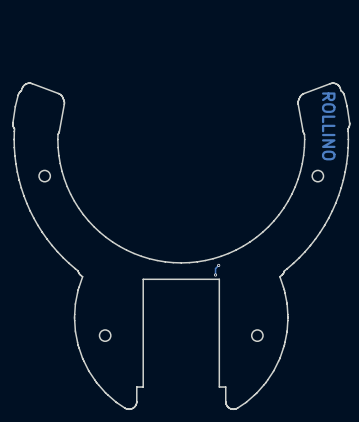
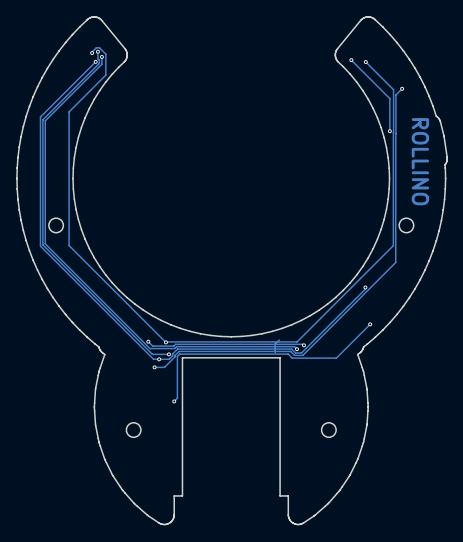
track: none -> (97, 51) (99, 63) (42, 119) (42, 244) (152, 354) (168, 354)
via: none -> (97, 51)
track: none -> (92, 53) (96, 47) (99, 47) (105, 54) (105, 75) (69, 111) (69, 245) (165, 342)
via: none -> (92, 53)
track: none -> (101, 56) (101, 64) (45, 120) (45, 243) (149, 348) (174, 348) (176, 346) (294, 346) (297, 349)
via: none -> (101, 56)
track: none -> (351, 60) (389, 98) (389, 131)
via: none -> (351, 60)
track: none -> (95, 61) (40, 117) (40, 246) (153, 359) (169, 359) (177, 349) (291, 349) (295, 353) (301, 353) (365, 287)
via: none -> (95, 61)
track: none -> (365, 62) (393, 89) (393, 245) (297, 341) (165, 342)
via: none -> (365, 62)
track: none -> (402, 88) (395, 94) (395, 262) (302, 355) (294, 355) (290, 351) (179, 351) (164, 367) (154, 367)
via: none -> (402, 88)
board edge: (340, 88) (336, 84) (331, 83) (300, 96) (298, 103) (304, 139) -> (435, 113) (420, 77) (397, 42) (373, 18) (368, 16) (361, 19) (337, 48) (335, 56) (362, 90) (377, 117) (386, 147) (389, 178)
via: none -> (389, 131)
board edge: (14, 131) (12, 122) (18, 94) (24, 85) (31, 83) (59, 93) (62, 97) (64, 103) (57, 139) -> (17, 167) (21, 136) (26, 116) (42, 77) (53, 59) (72, 34) (88, 18) (95, 17) (101, 20) (124, 48) (127, 55) (124, 61) (99, 90) (85, 117) (76, 147) (73, 178)
via: none -> (365, 287)
track: none -> (370, 324) (336, 358) (292, 358) (288, 354) (179, 354) (177, 356) (177, 398) (174, 401)
via: none -> (370, 324)
via: (218, 265) -> none
track: none -> (148, 341) (152, 346) (173, 346) (175, 344) (303, 345)
via: none -> (148, 341)
via: none -> (165, 342)
via: none -> (303, 345)
via: none -> (297, 349)
via: (215, 275) -> none
via: none -> (168, 354)
via: none -> (159, 359)
via: none -> (154, 367)
via: none -> (174, 401)

